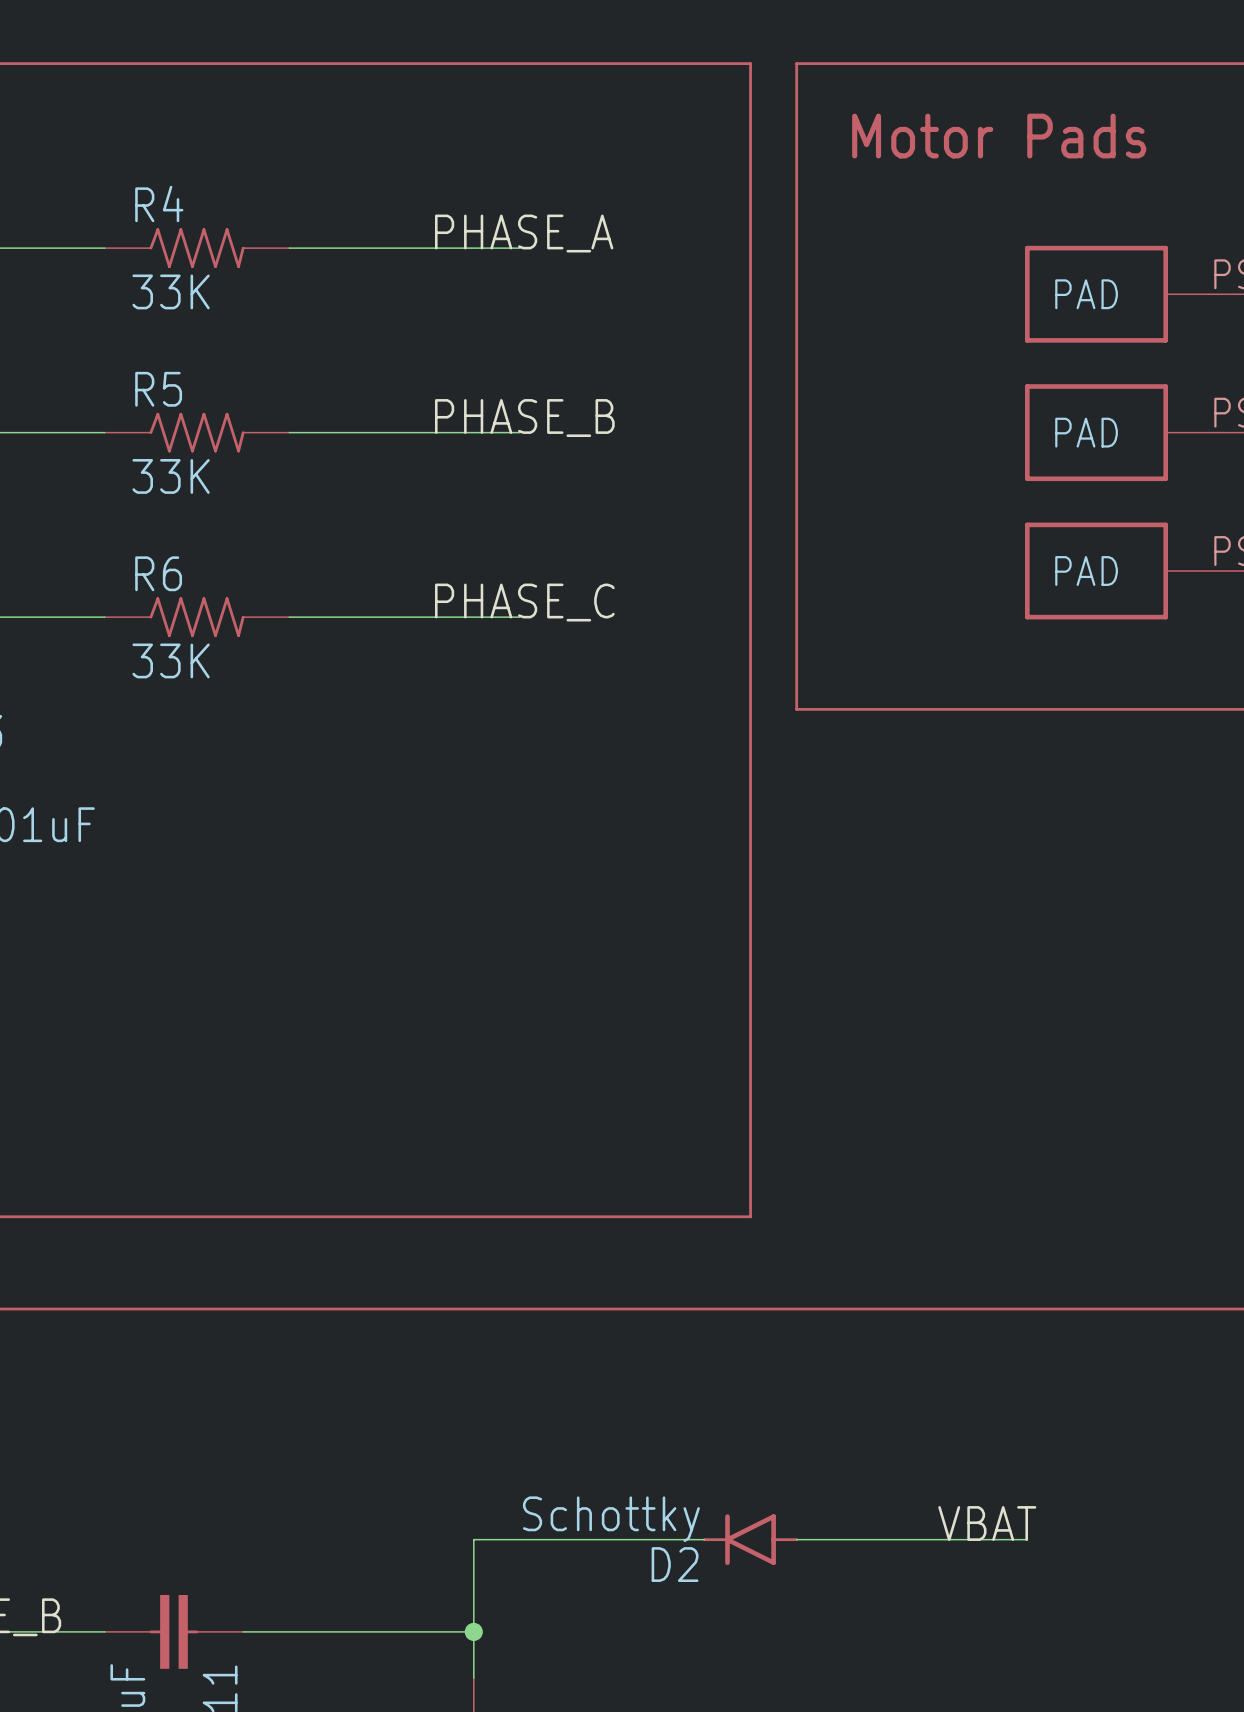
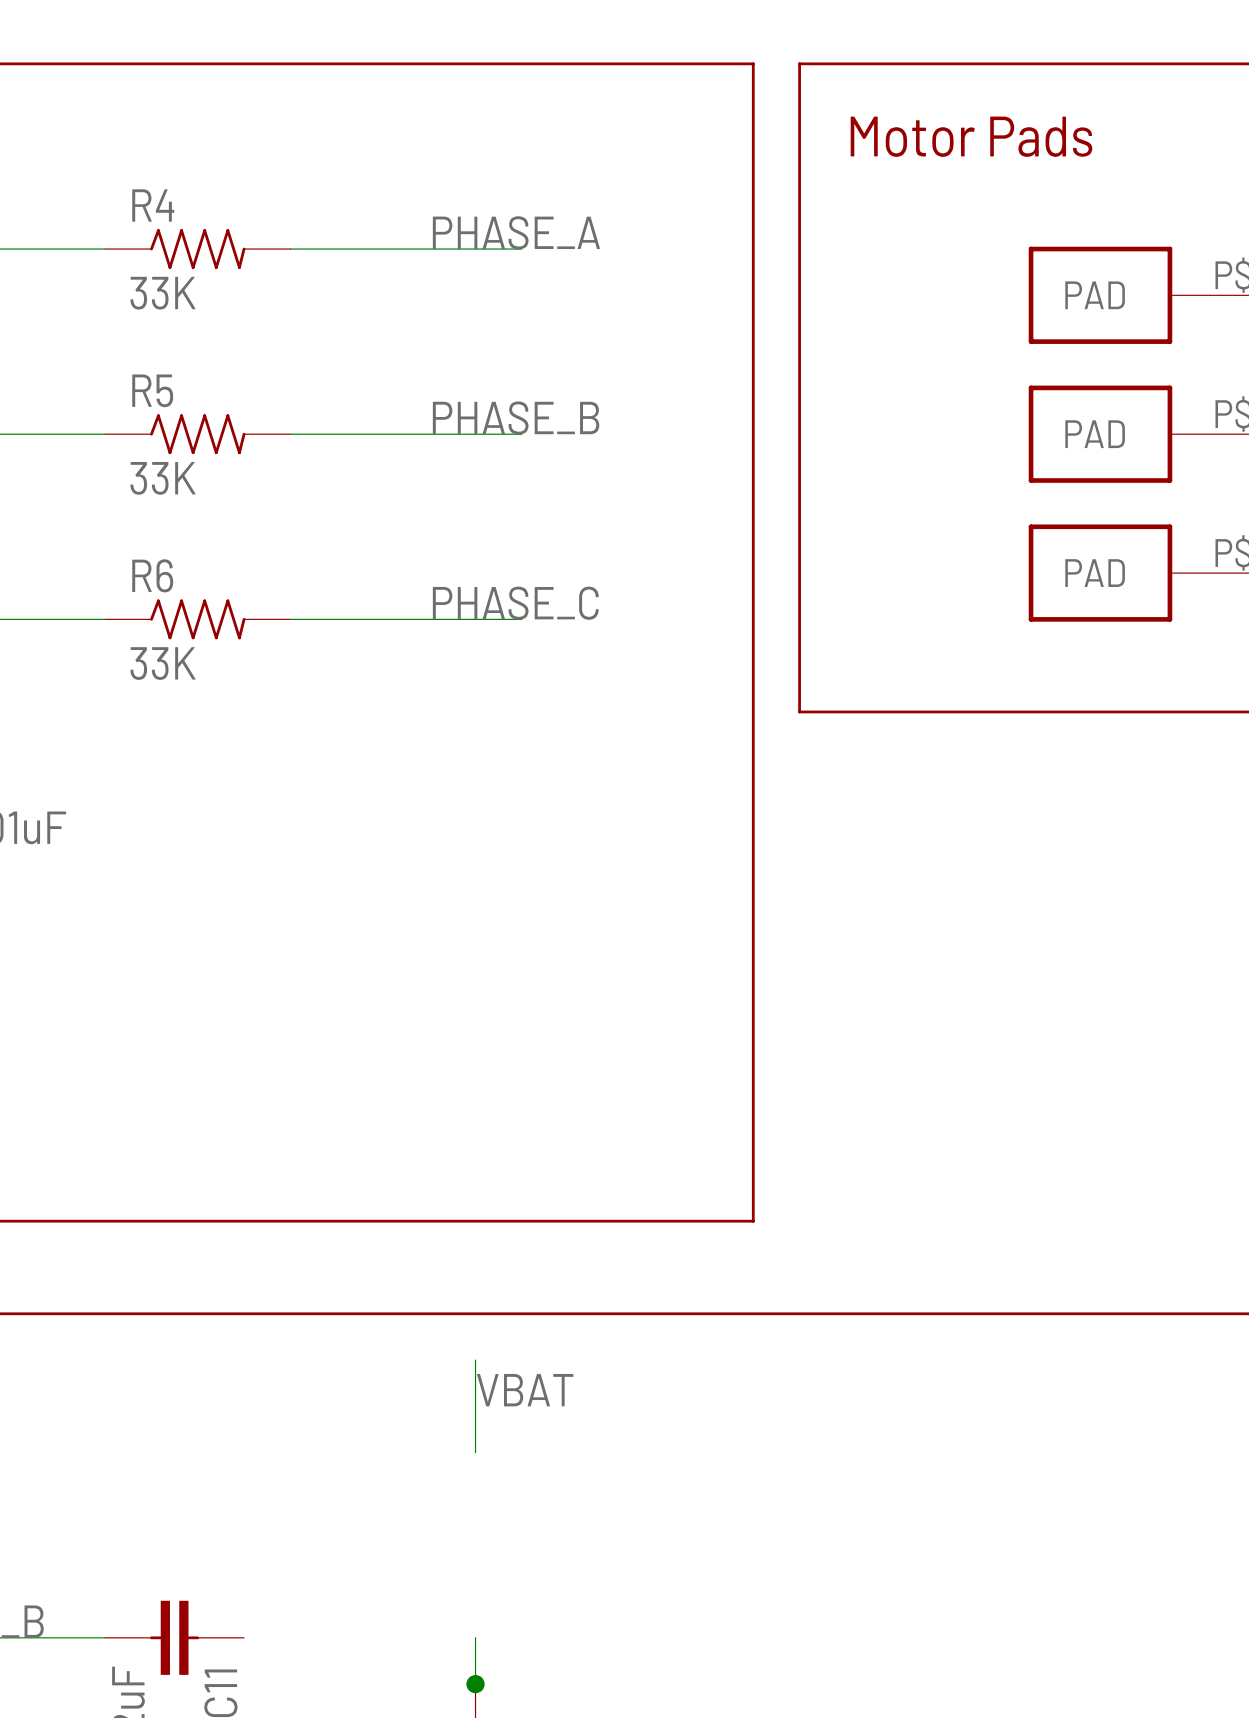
wire: none -> (475, 1360) (475, 1452)
label: none -> VBAT (525, 1390)
label: VBAT (987, 1523) -> none
wire: (704, 1539) (473, 1539) (473, 1631) (243, 1631) -> none
D2: Schottky (750, 1539) -> none
wire: (796, 1539) (1027, 1539) -> none
junction position: (473, 1631) -> (475, 1684)

